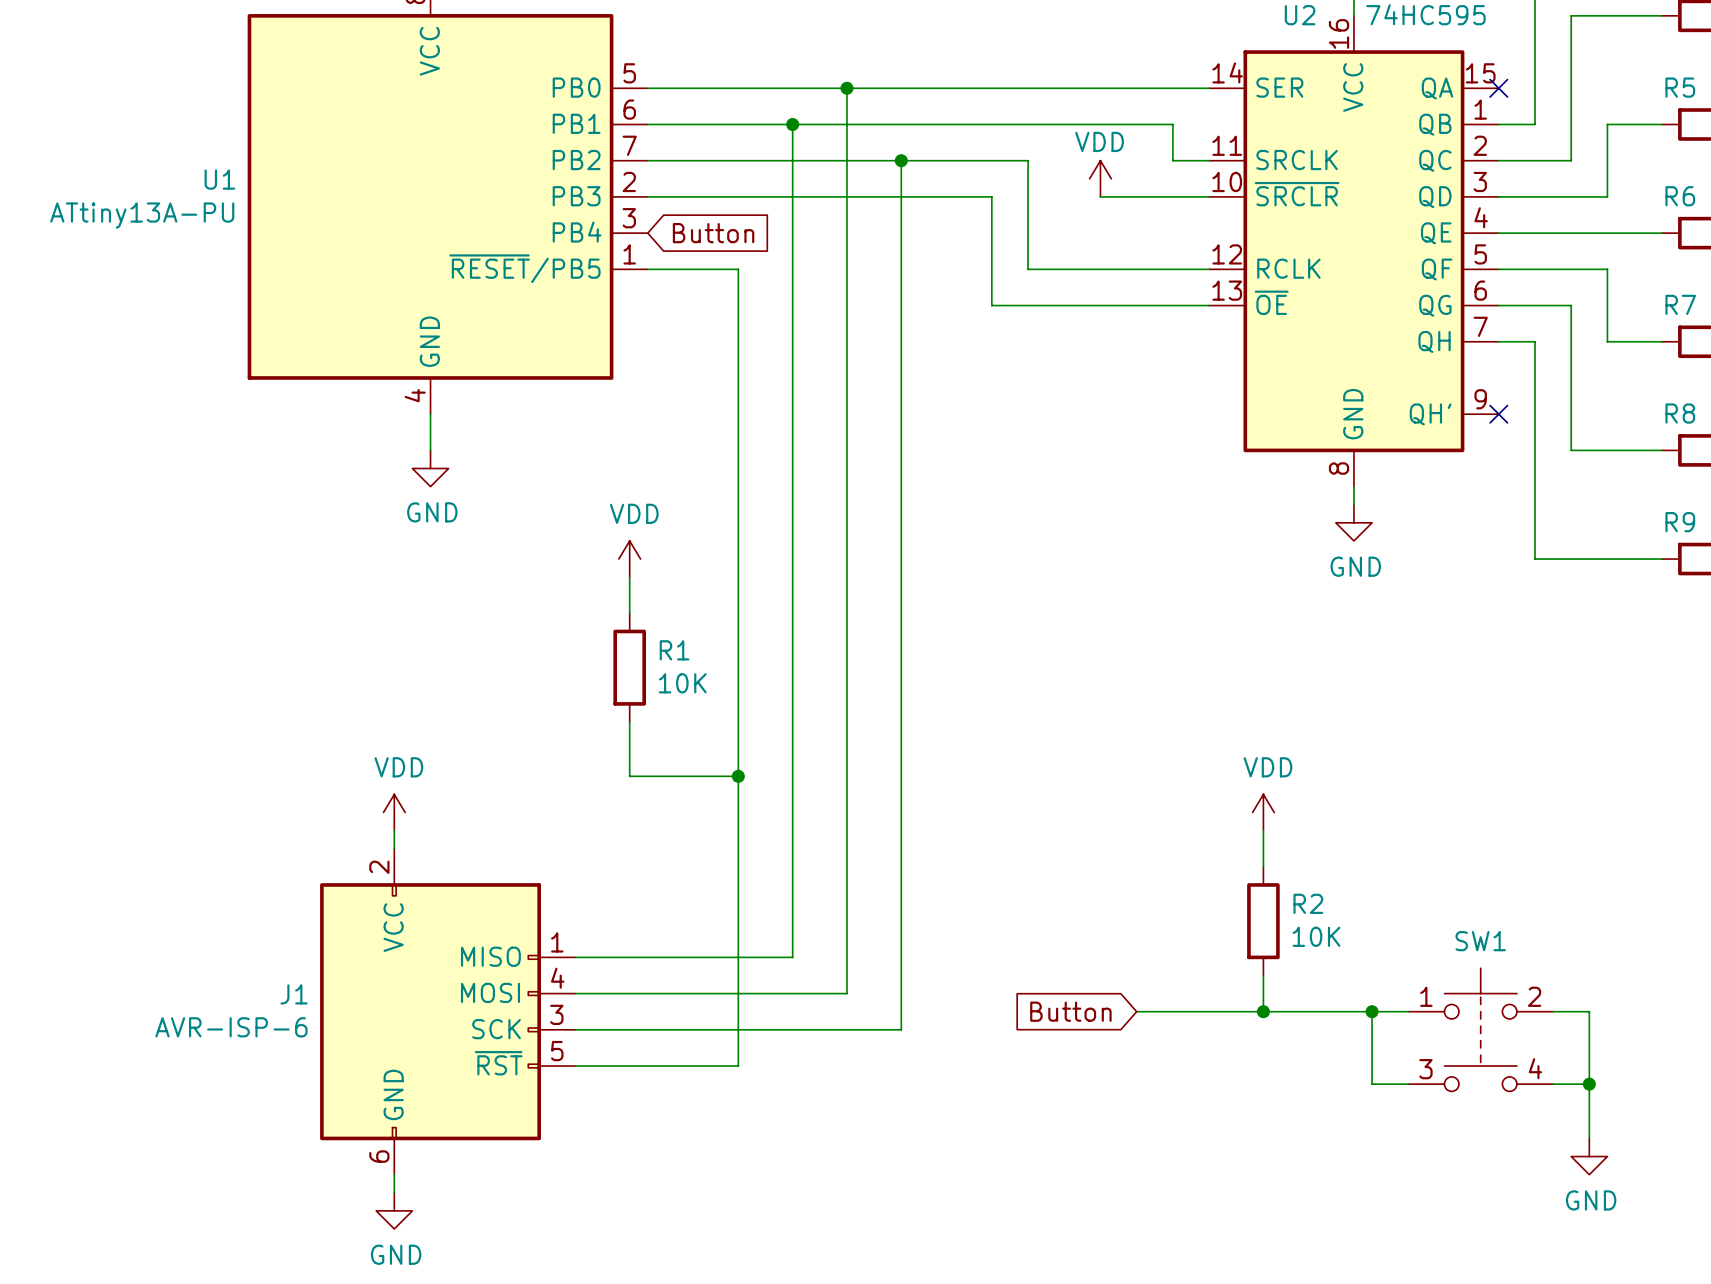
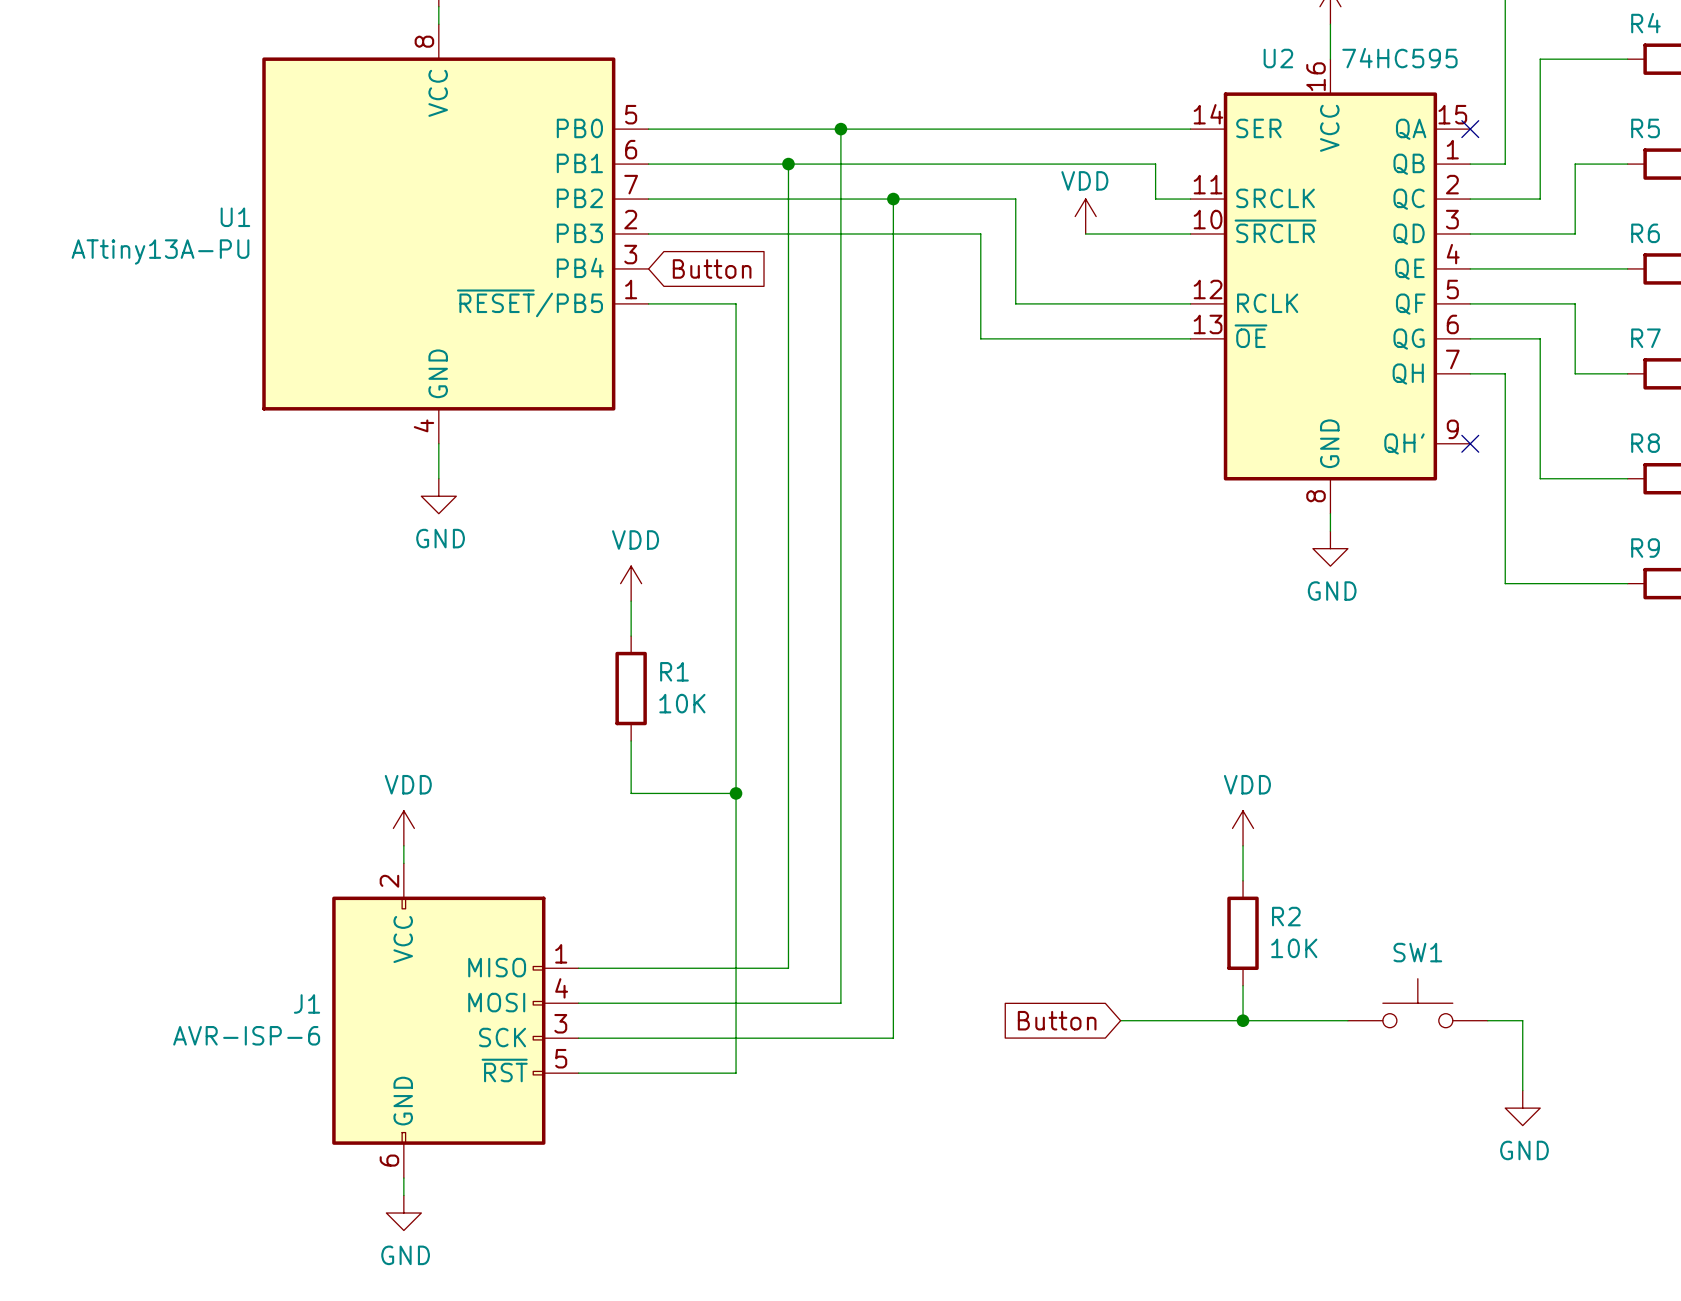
SW1 name position: SW1 (1480, 941) -> SW1 (1417, 952)
SW1 symbol: [1408, 968, 1554, 1092] -> [1347, 978, 1488, 1028]
junction: (1372, 1011) -> none
wire: (1408, 1011) (1372, 1011) (1372, 1084) (1408, 1084) -> none
wire: (1553, 1011) (1589, 1011) (1589, 1138) -> none
wire: (1553, 1084) (1589, 1084) -> (1522, 1090) (1522, 1020) (1487, 1020)
junction: (1589, 1084) -> none
power symbol position: GND (1589, 1156) -> GND (1522, 1108)

